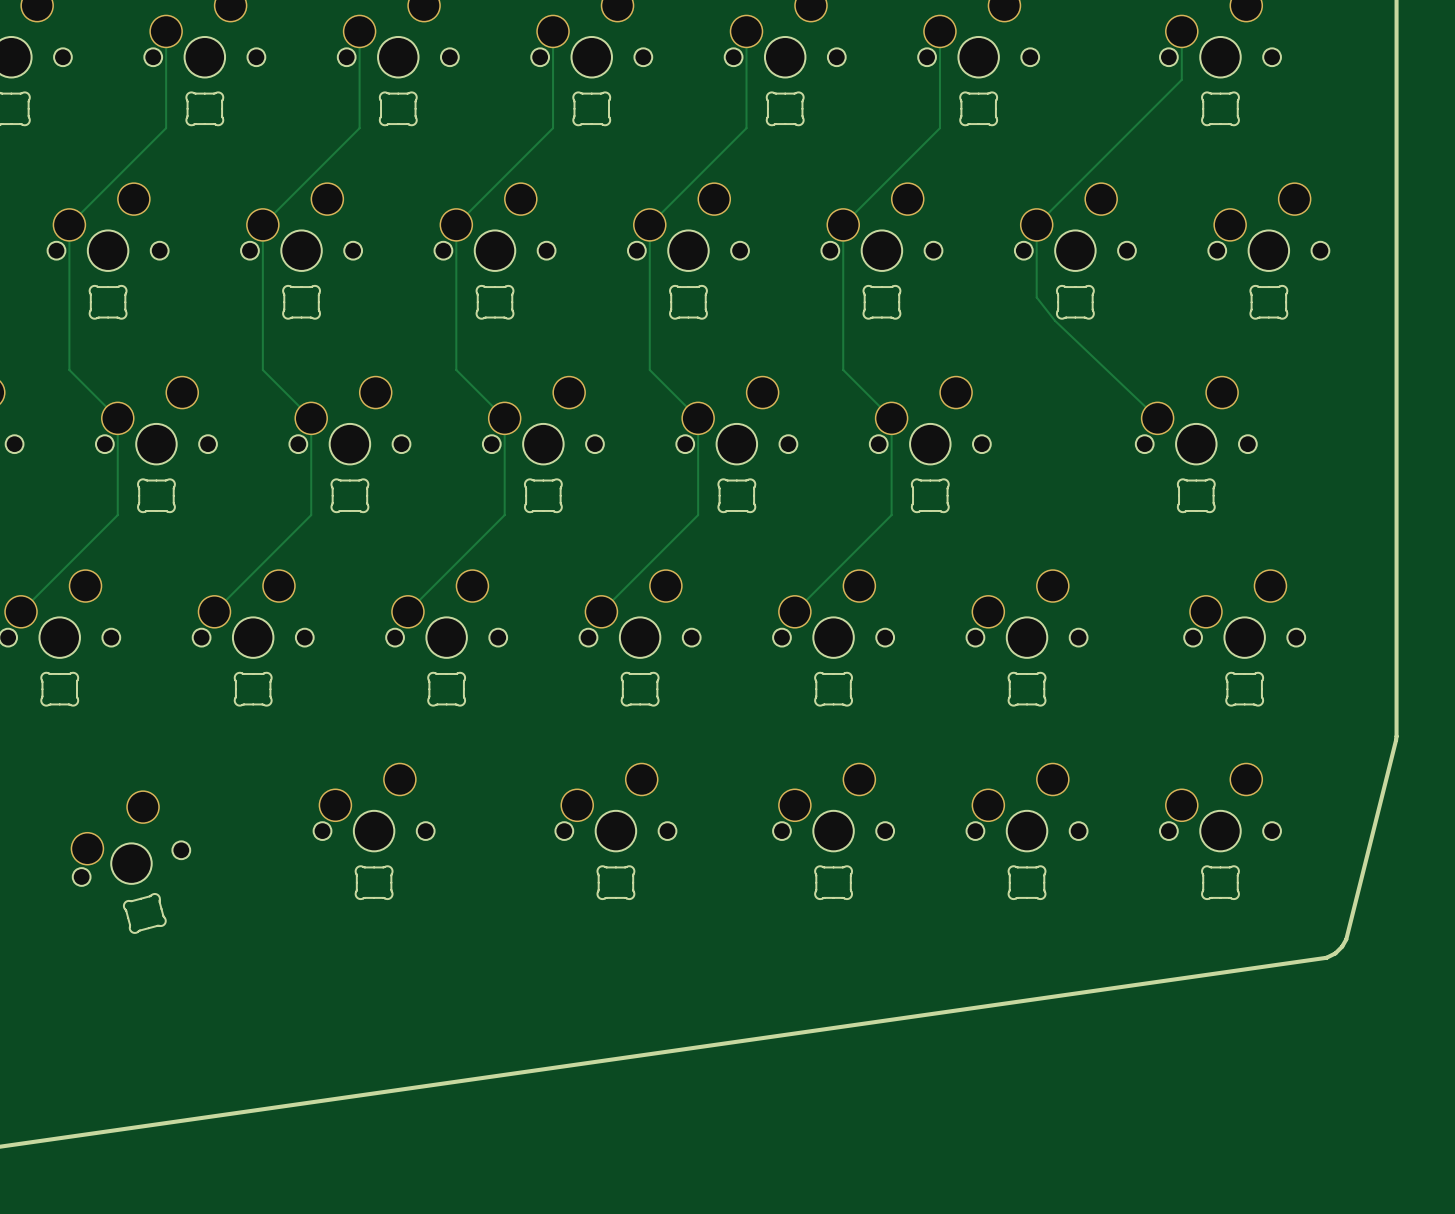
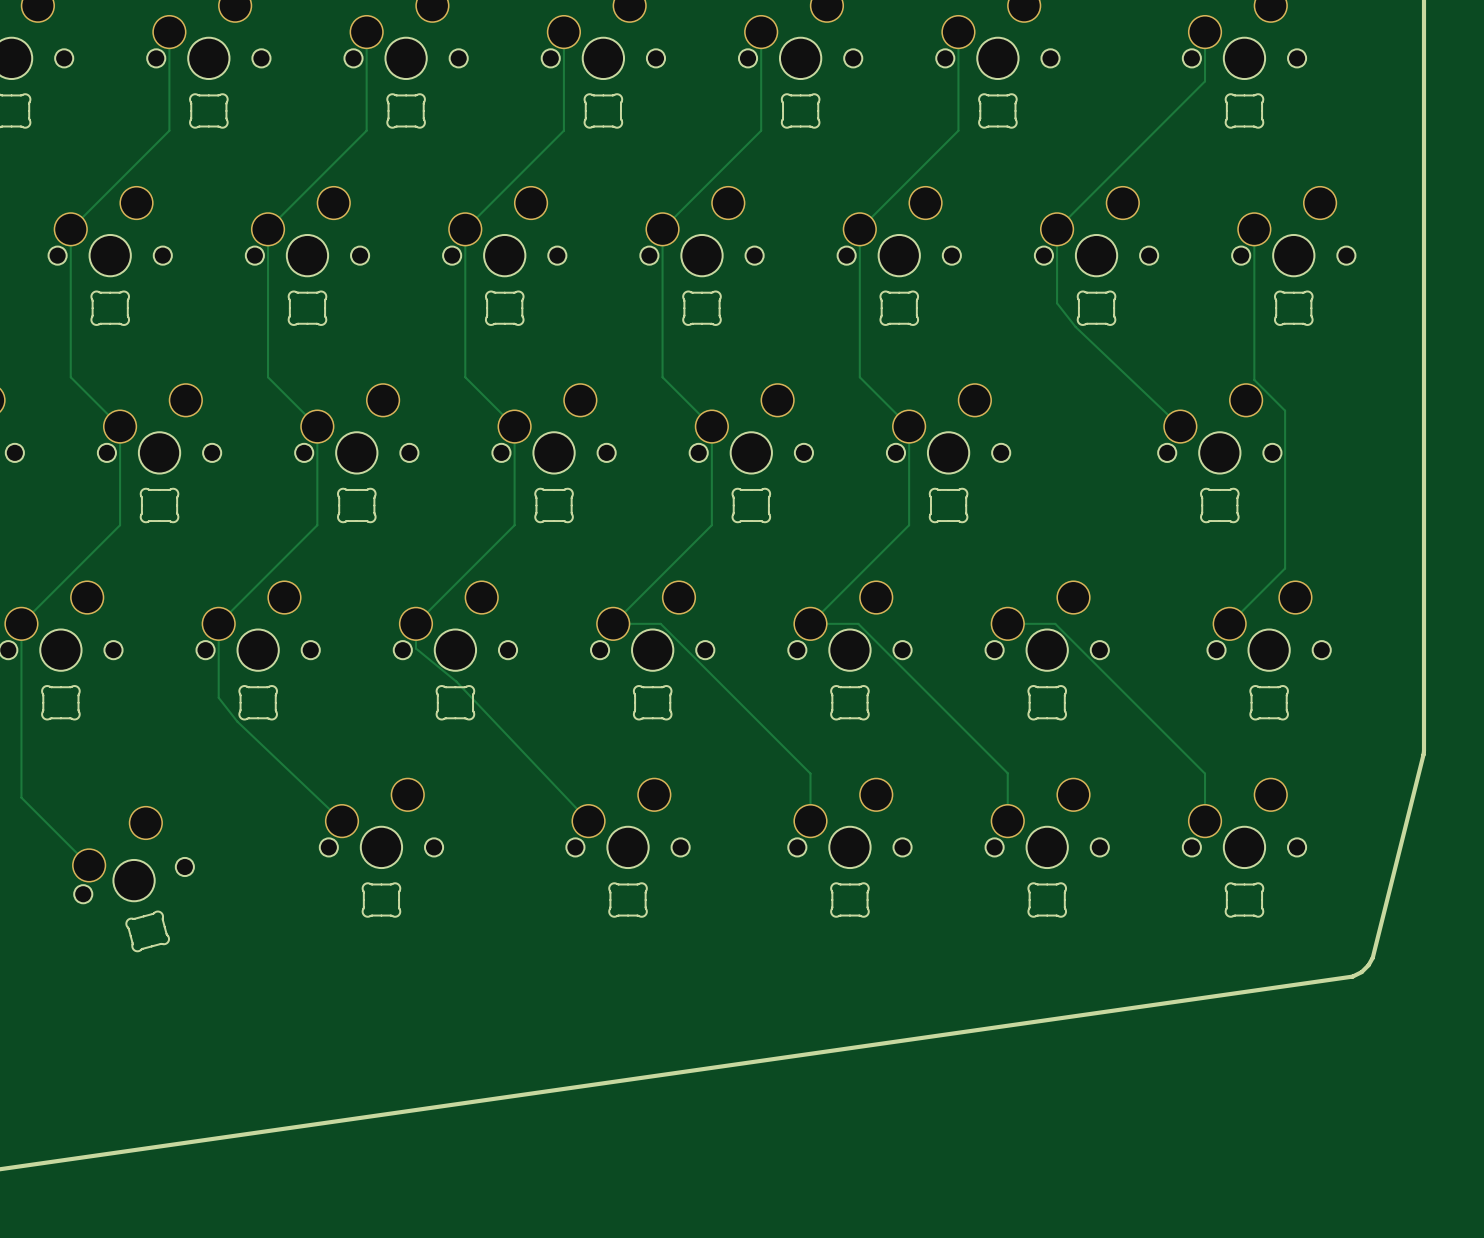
track: none -> (1254, 229) (1254, 379) (1285, 410) (1285, 568) (1229, 623)
track: none -> (21, 623) (21, 797) (89, 865)
track: none -> (218, 623) (218, 697) (237, 721) (341, 821)
track: none -> (415, 623) (415, 648) (456, 681) (588, 821)
track: none -> (613, 623) (660, 623) (810, 773) (810, 821)
track: none -> (810, 623) (858, 623) (1007, 773) (1007, 821)
track: none -> (1007, 623) (1055, 623) (1205, 773) (1205, 821)

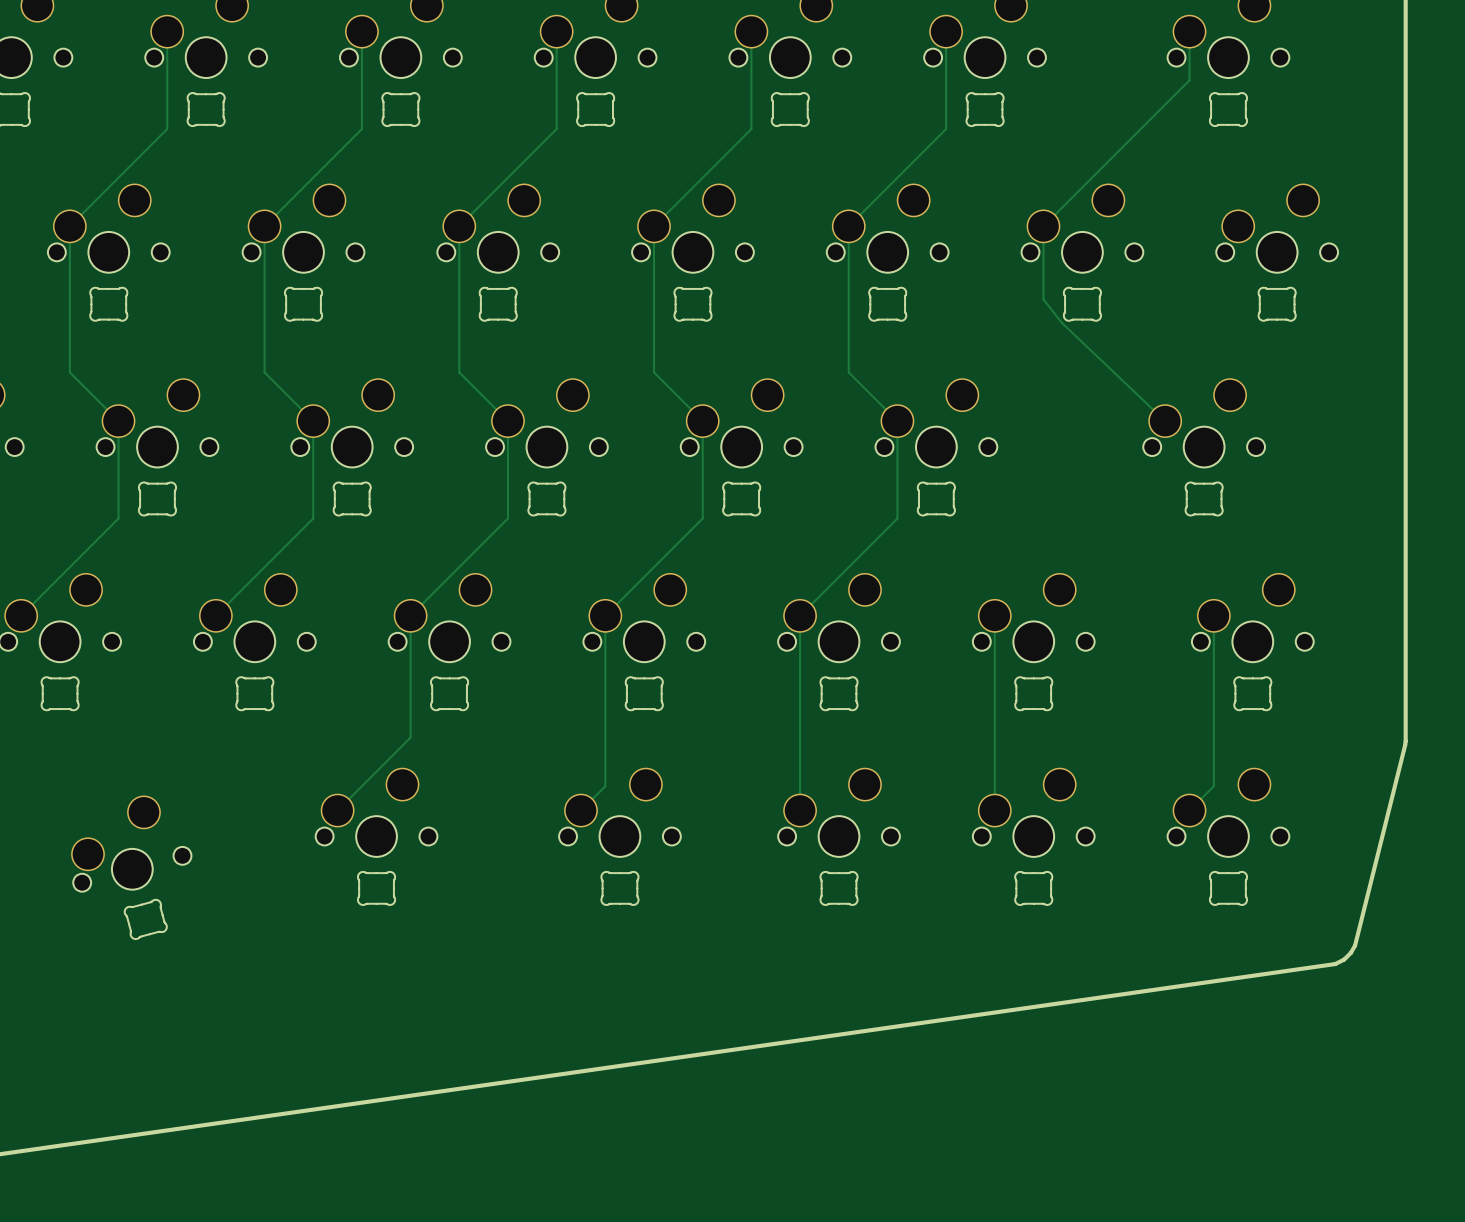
track: (1254, 229) (1254, 379) (1285, 410) (1285, 568) (1229, 623) -> none
track: (21, 623) (21, 797) (89, 865) -> none
track: (218, 623) (218, 697) (237, 721) (341, 821) -> (410, 640) (410, 737) (337, 810)
track: (613, 623) (660, 623) (810, 773) -> (800, 615) (800, 763)
track: (810, 623) (858, 623) (1007, 773) -> (994, 615) (994, 763)
track: (1007, 623) (1055, 623) (1205, 773) (1205, 821) -> (1213, 615) (1213, 786) (1189, 810)
track: (415, 648) (456, 681) (588, 821) -> (605, 615) (605, 786) (581, 810)

